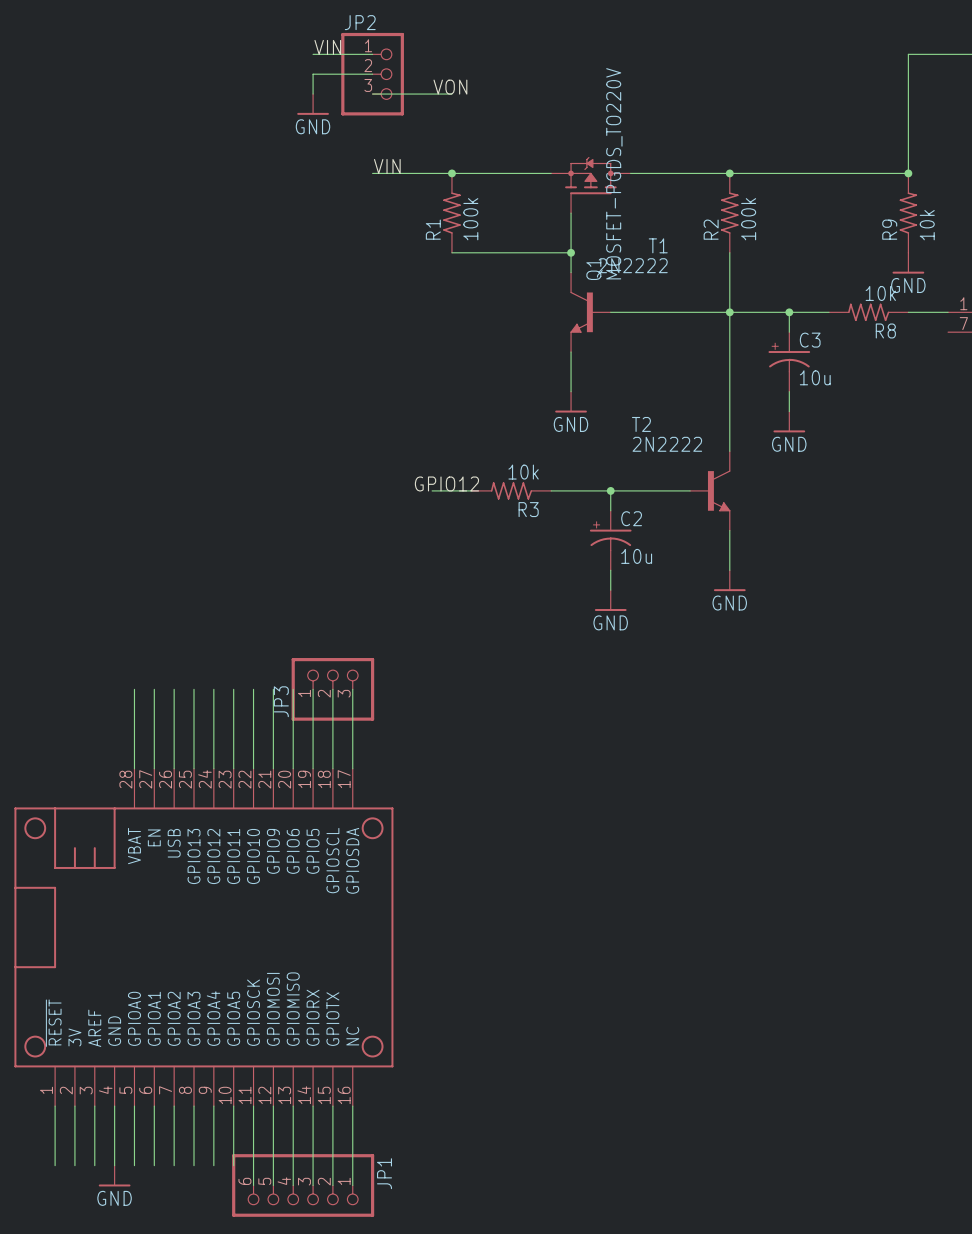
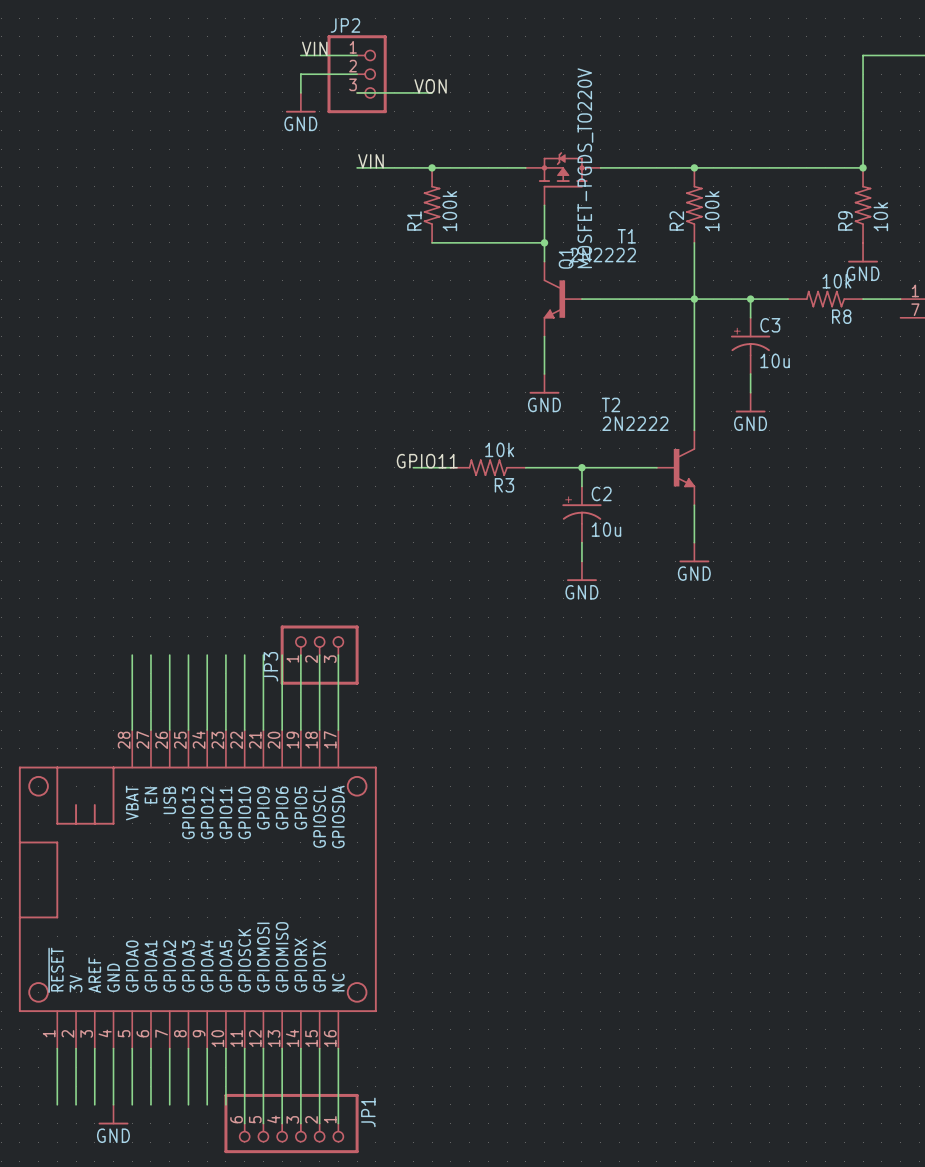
label: GPIO12 (446, 483) -> GPIO11 (427, 461)

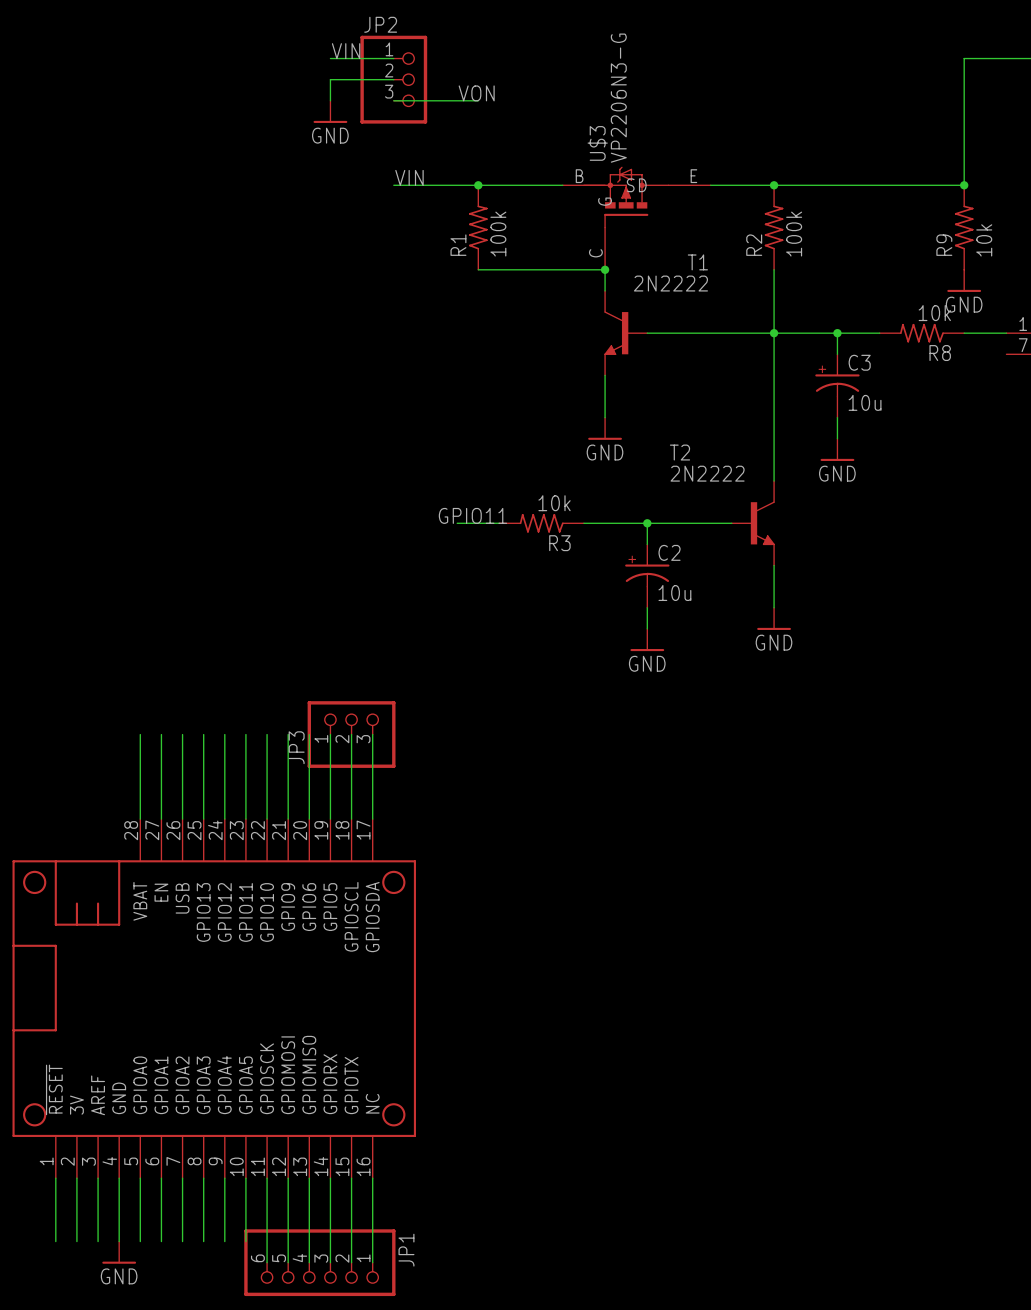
Q1: MOSFET-PGDS_TO220V (563, 178) -> none
U$3: none -> VP2206N3-G (636, 218)

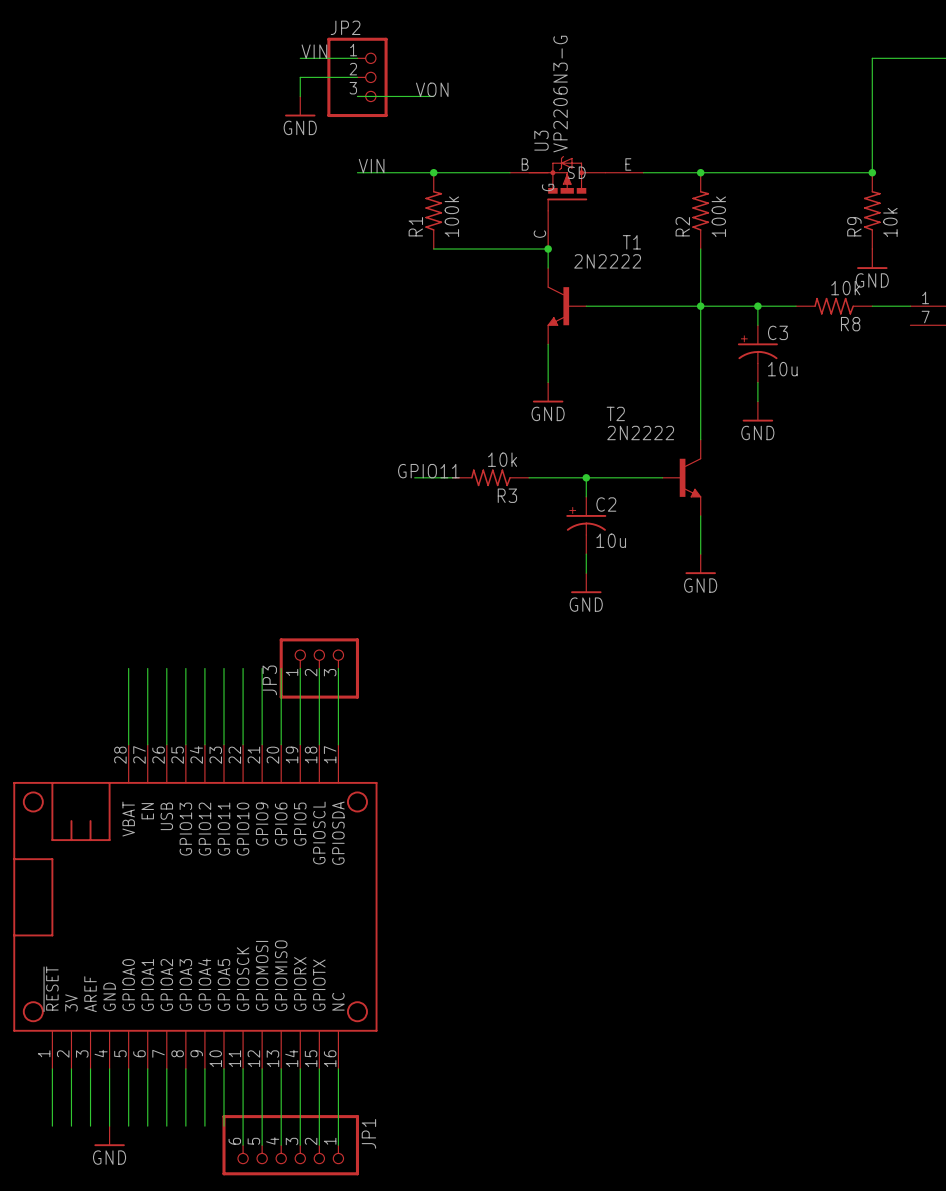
U$3 name: U$3 (597, 143) -> U3 (541, 140)

